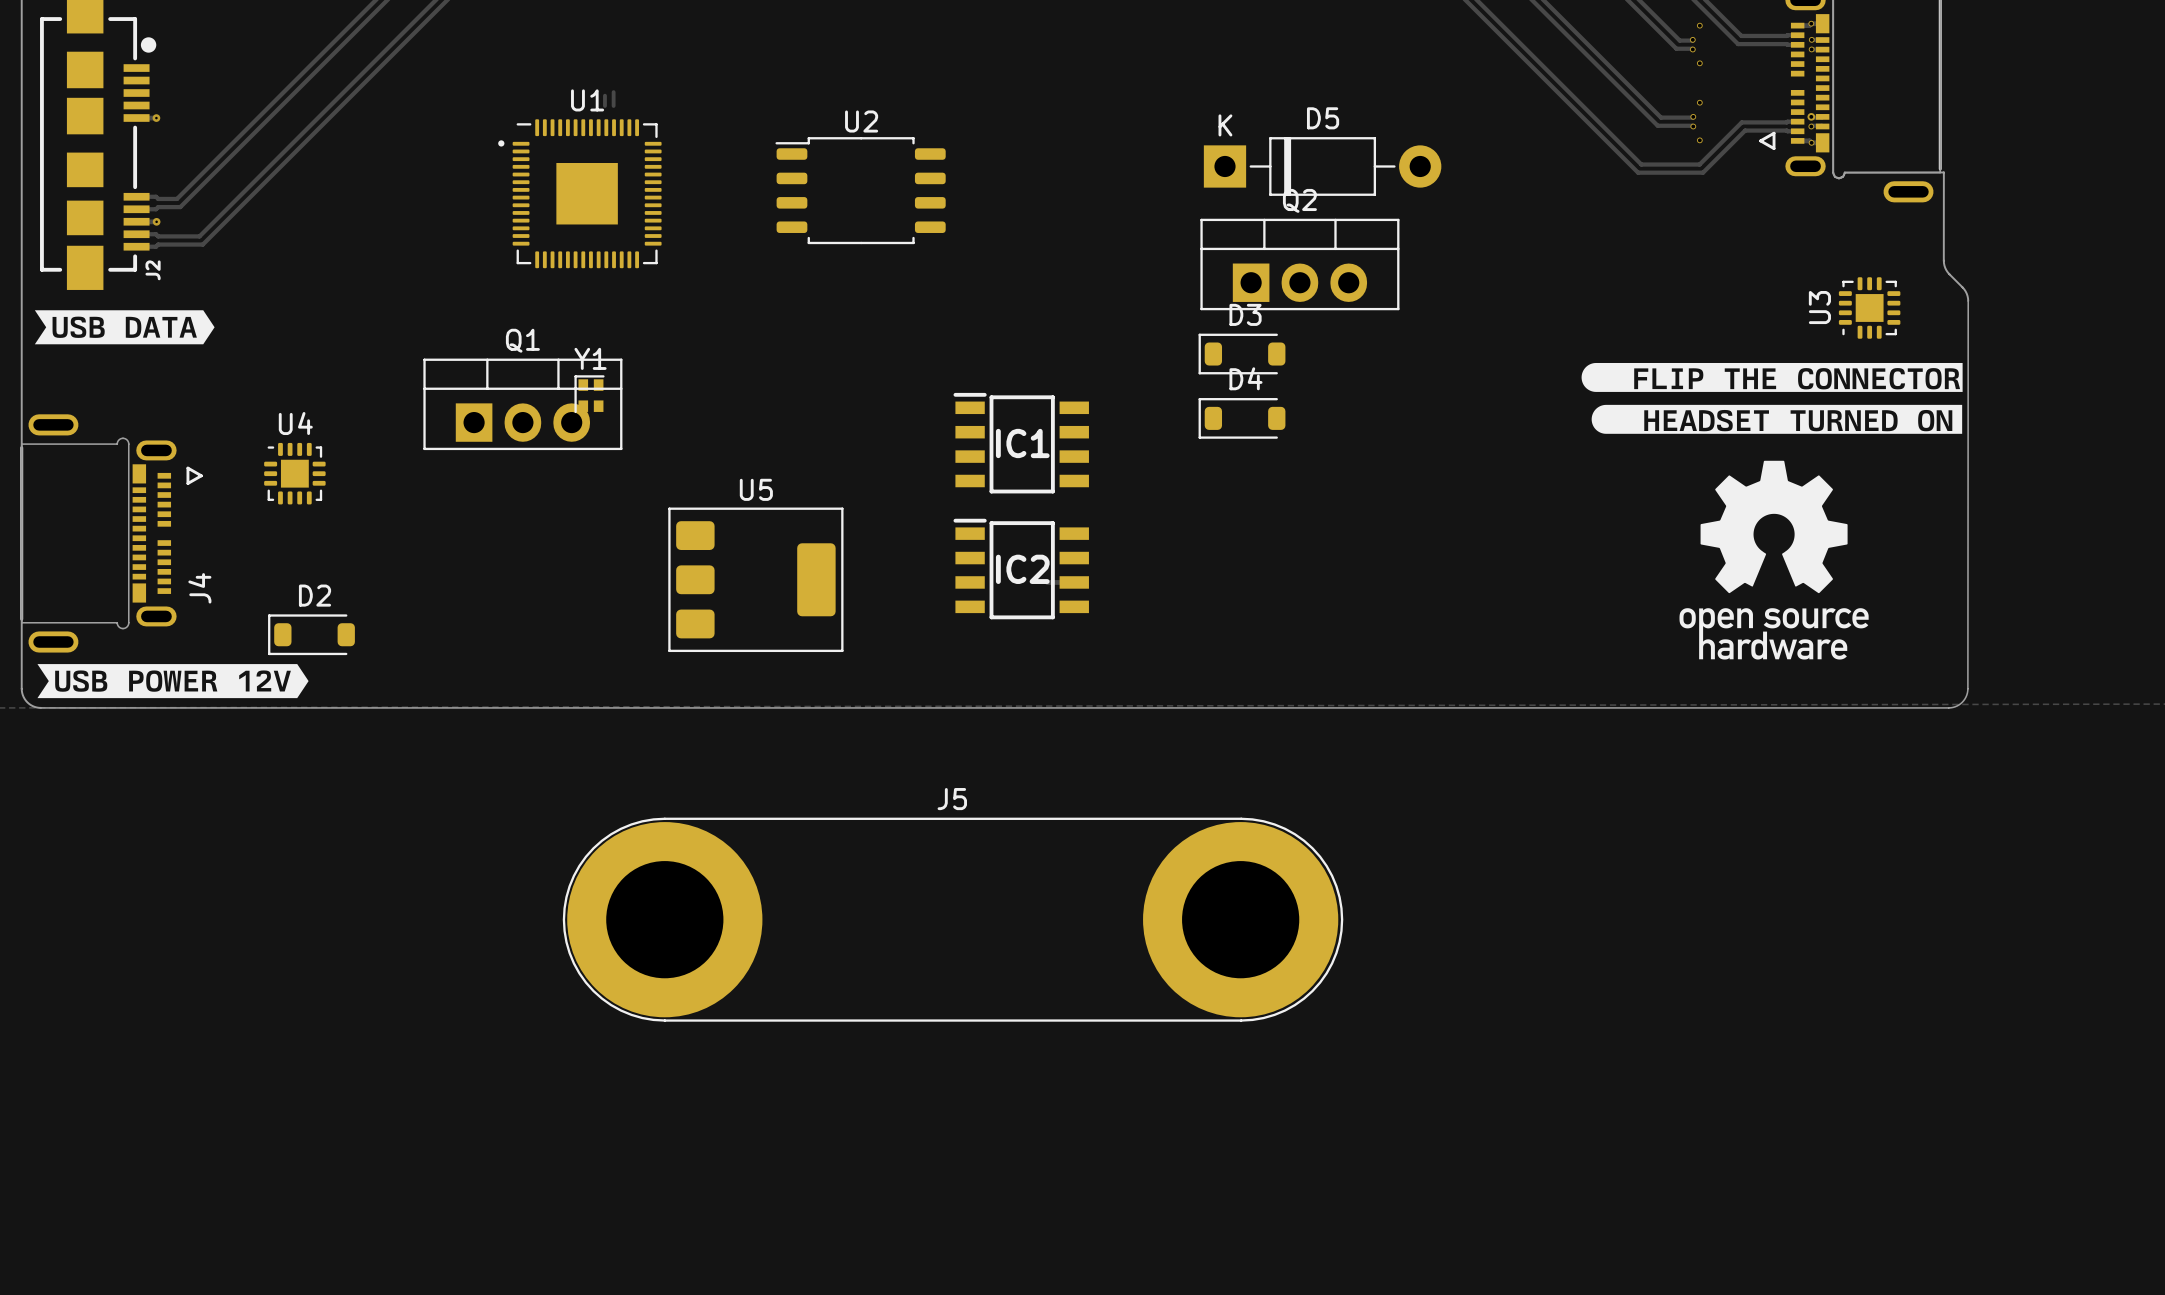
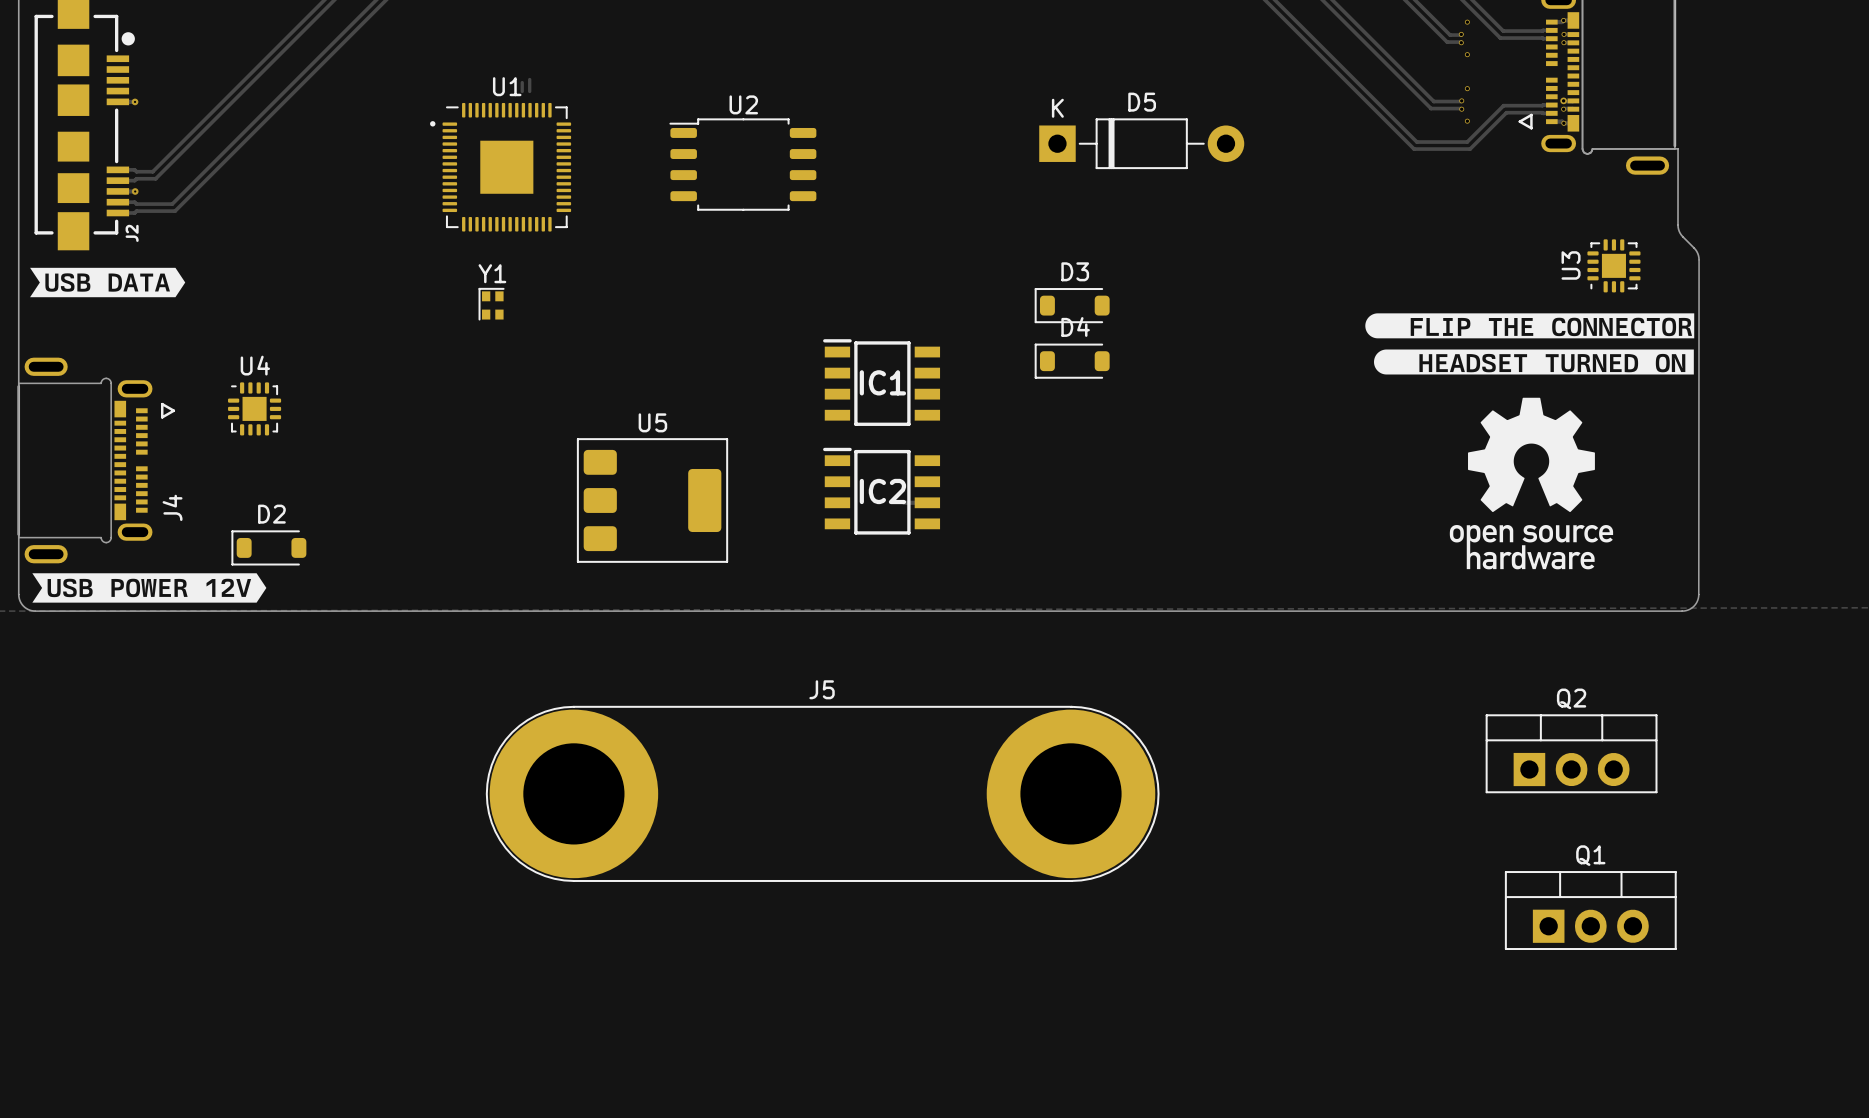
Q2 position: (1299, 264) -> (1571, 753)
Y1 position: (589, 394) -> (491, 304)
Q1 position: (522, 404) -> (1590, 910)

